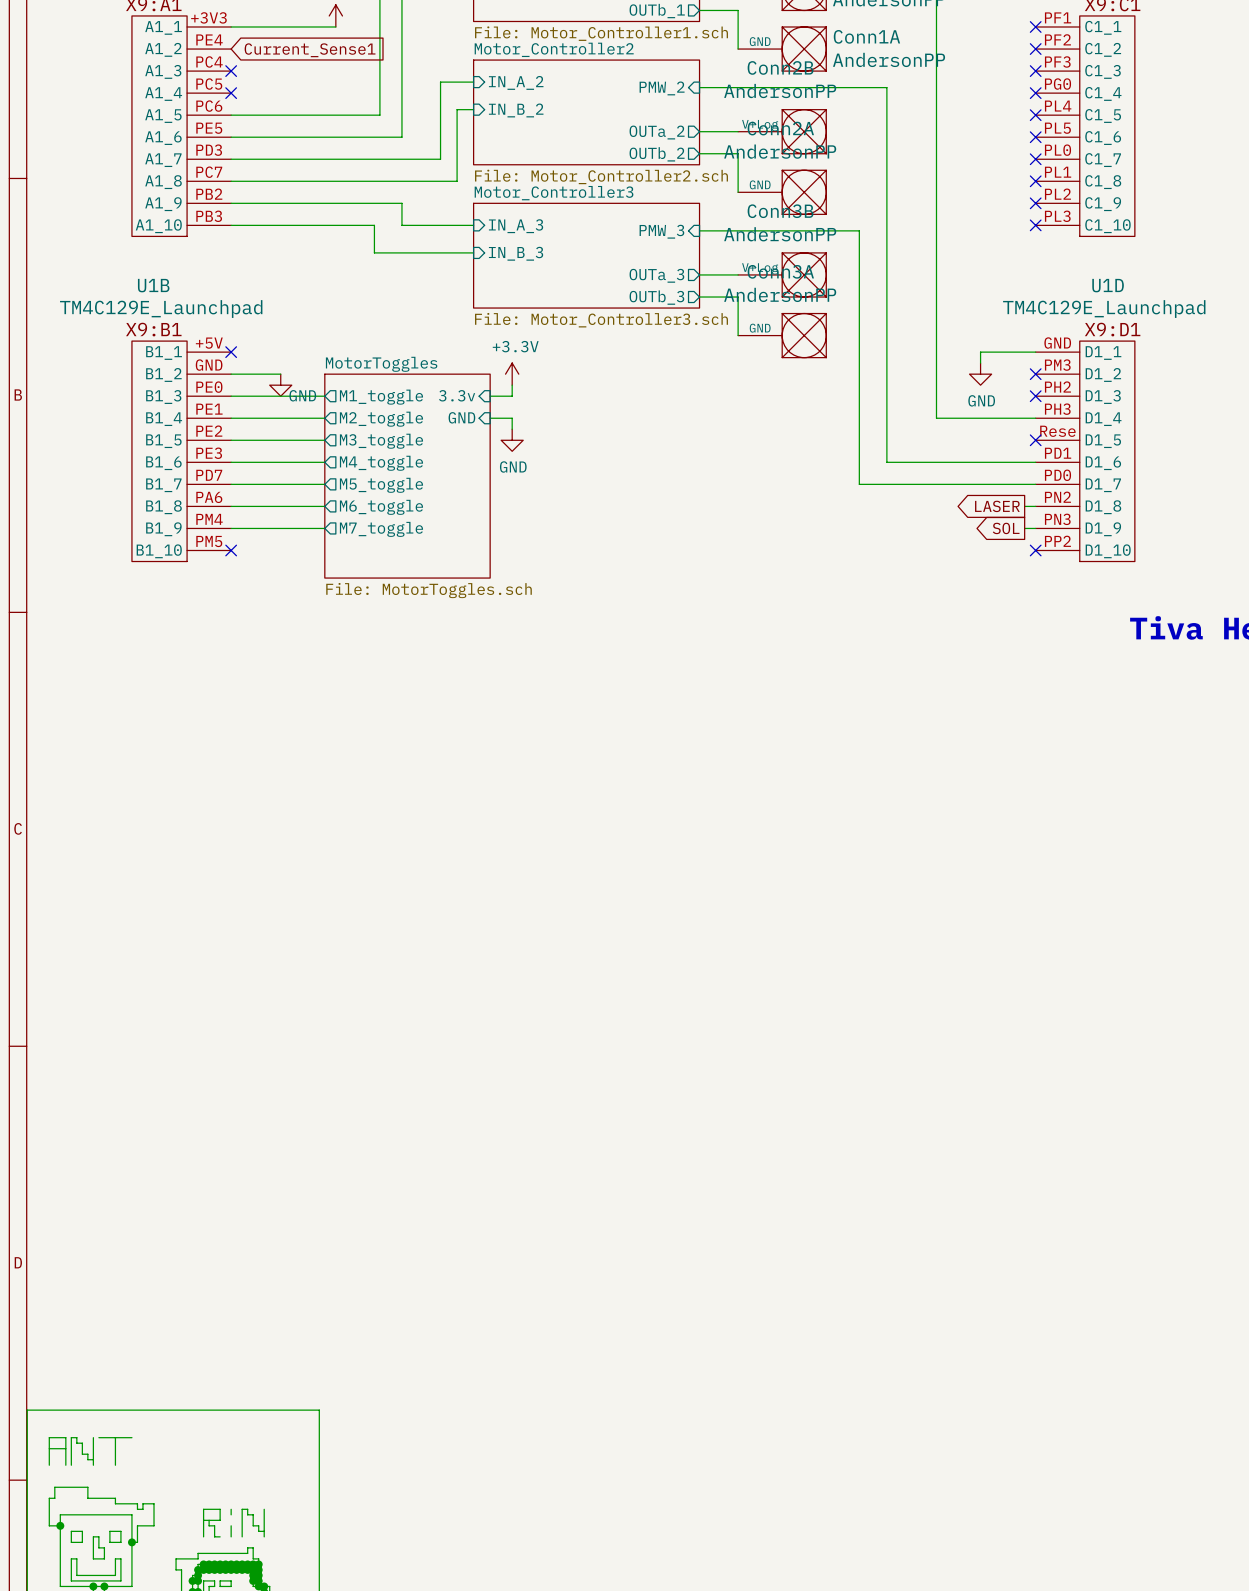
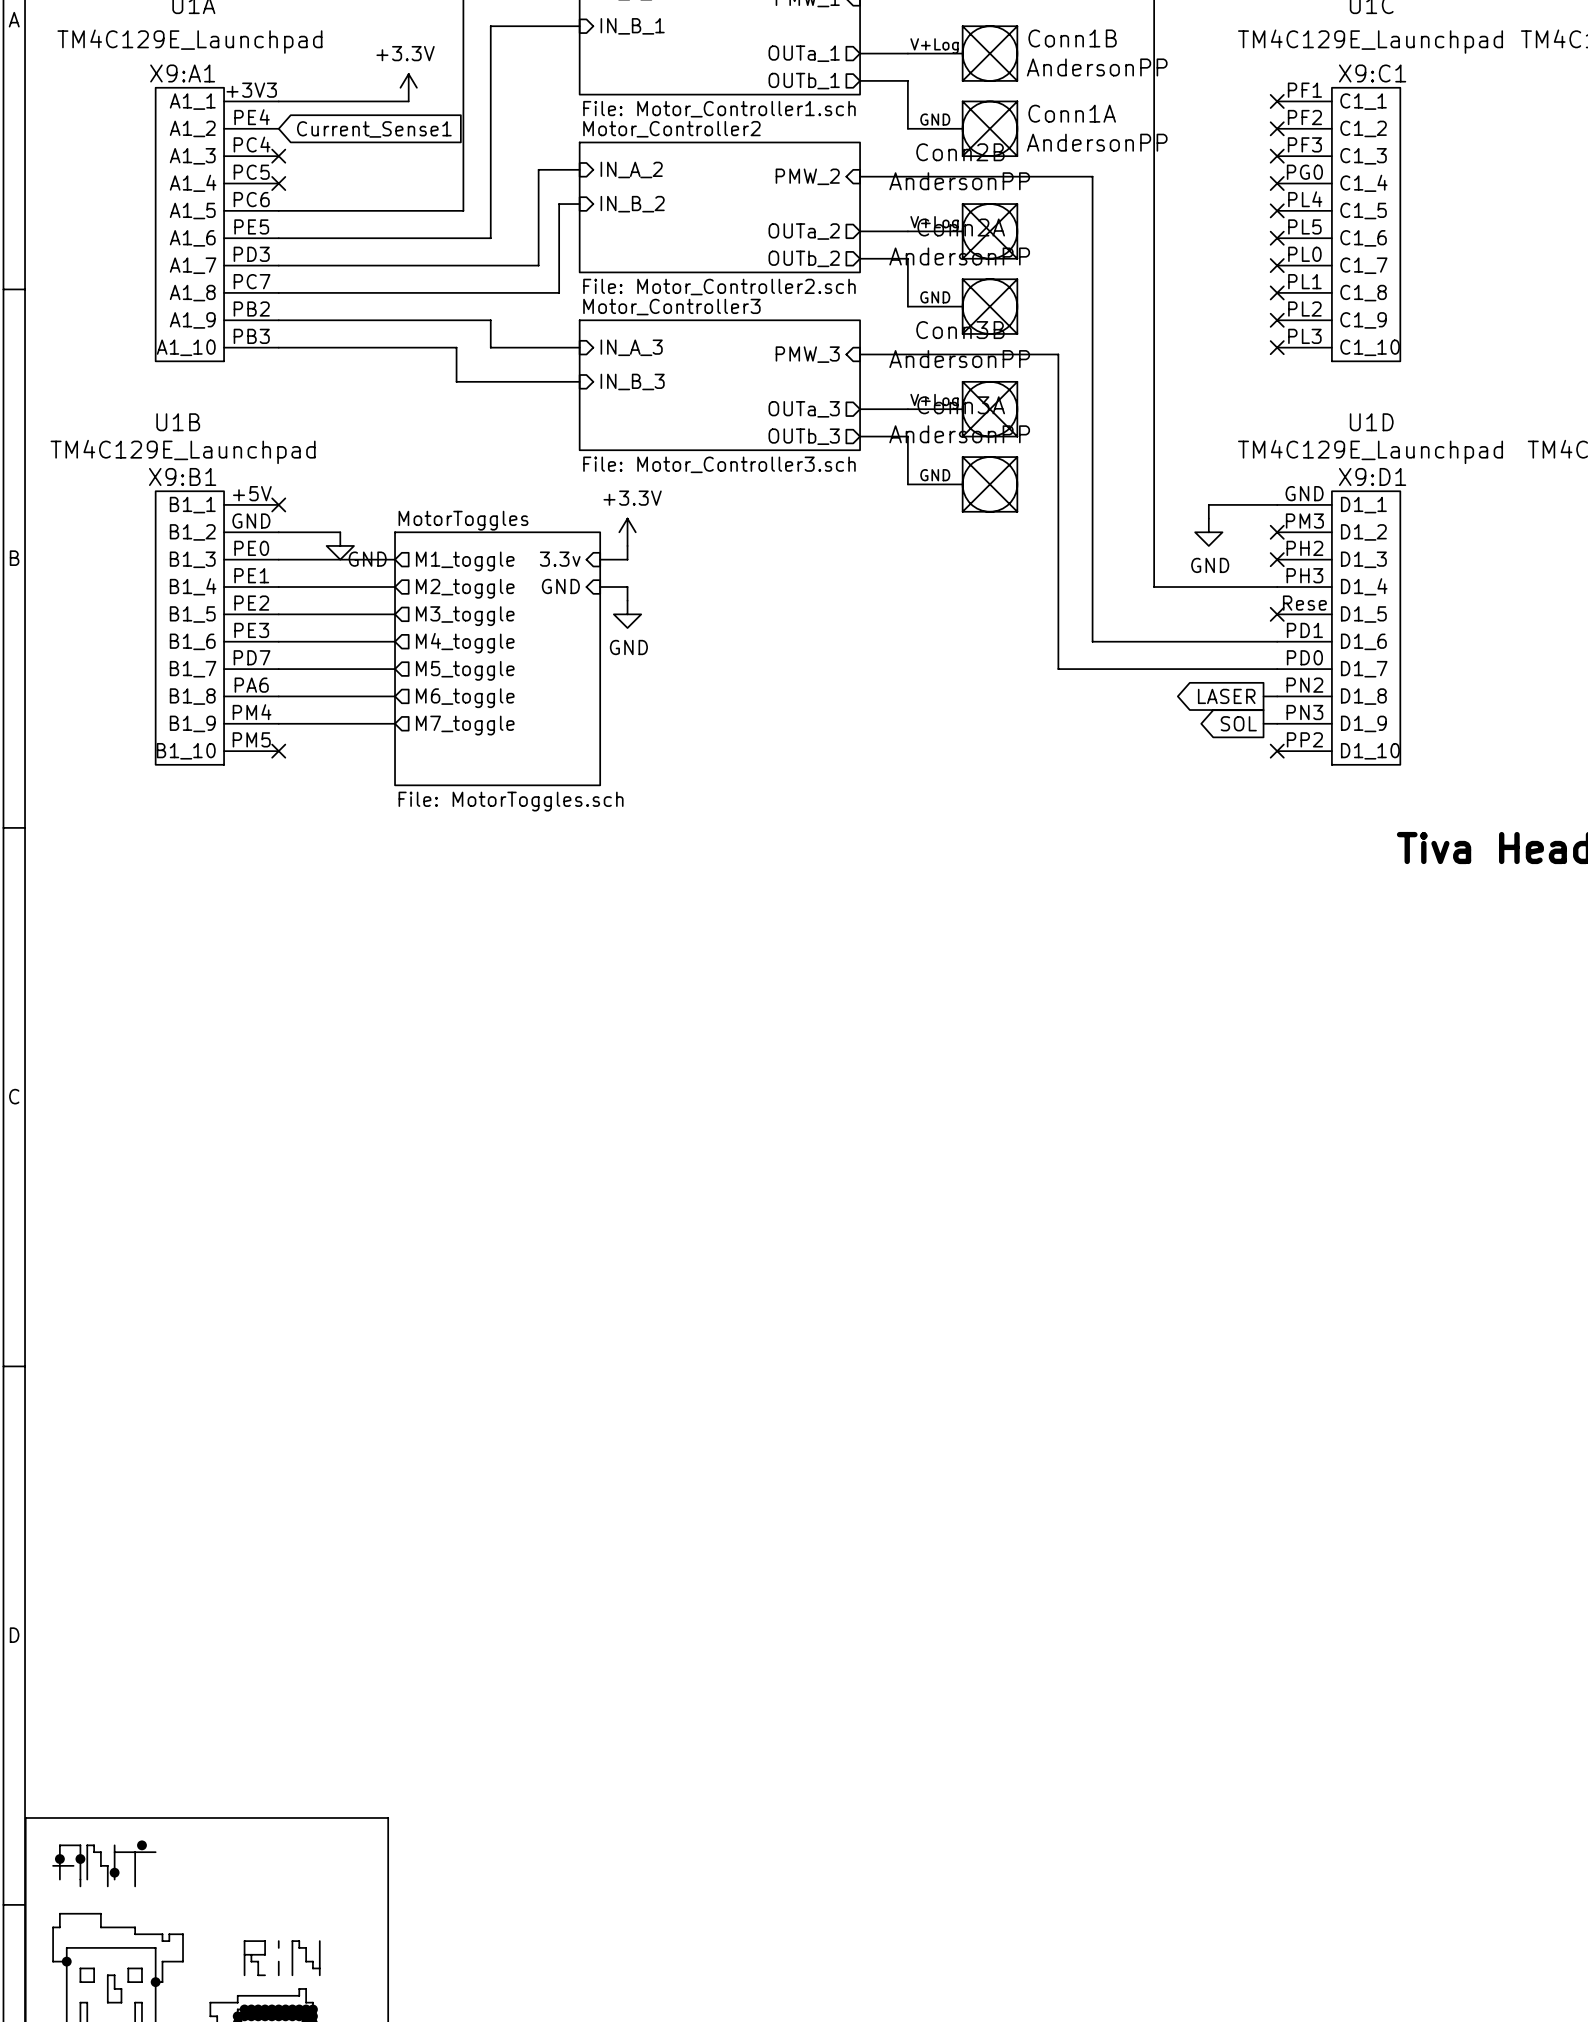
wire: none -> (114, 1845) (114, 1879)
junction: none -> (141, 1845)
wire: (71, 1437) (76, 1437) -> (80, 1852) (80, 1845) (59, 1845) (59, 1879)
wire: (93, 1437) (93, 1448) -> (87, 1852) (87, 1845) (94, 1845) (94, 1852) (100, 1852) (100, 1865) (107, 1865)
junction: none -> (59, 1859)
junction: none -> (80, 1859)
wire: (76, 1443) (82, 1443) (82, 1454) (87, 1454) (87, 1459) (93, 1459) -> (87, 1859) (87, 1879)
junction: none -> (114, 1872)
wire: (49, 1465) (49, 1437) (65, 1437) (65, 1465) -> none

